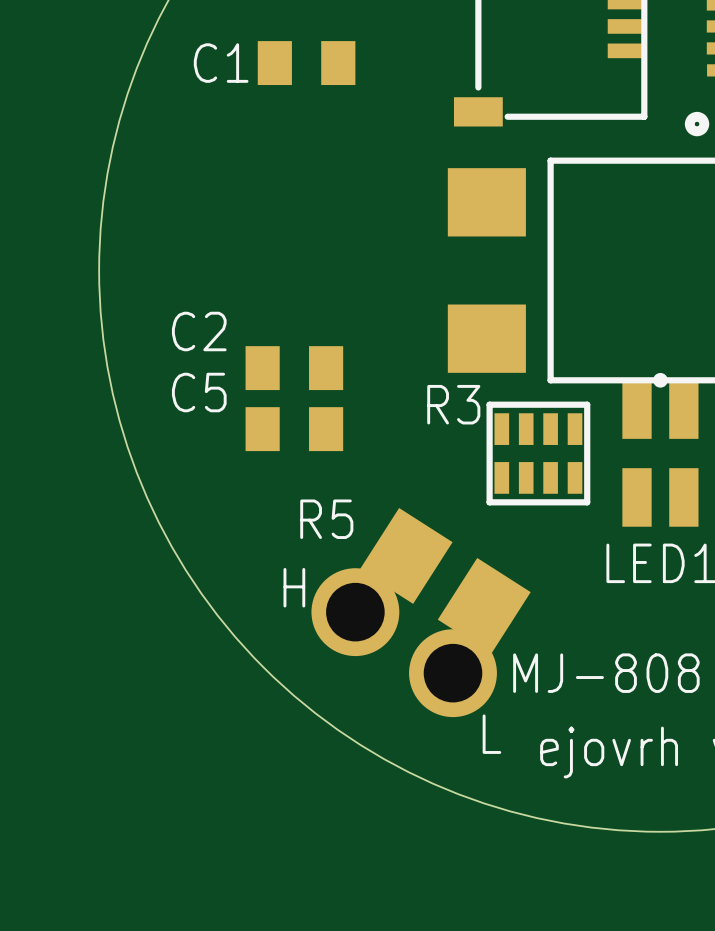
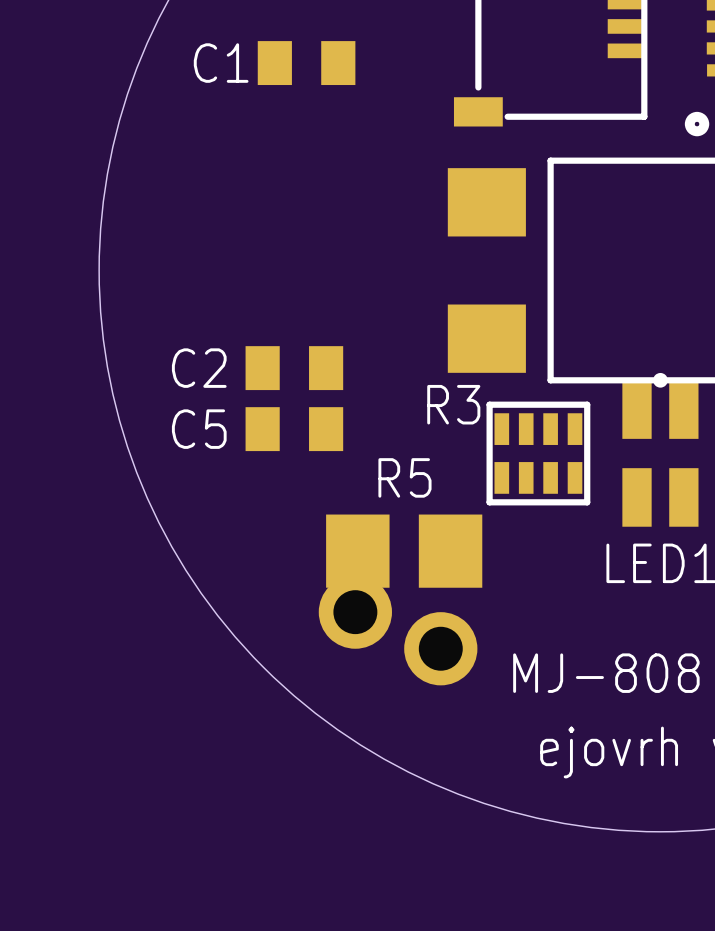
C2 name position: C2 (199, 331) -> C2 (199, 368)
C5 name position: C5 (199, 392) -> C5 (199, 429)
R5 name position: R5 (326, 519) -> R5 (404, 477)
part footprint: [311, 568, 400, 657] -> [318, 575, 392, 649]
R5 rotation: 0° (445, 580) -> 32.6° counterclockwise (404, 551)
text: H (294, 587) -> none
part footprint: [409, 629, 497, 718] -> [404, 612, 478, 686]
text: L (491, 734) -> none

